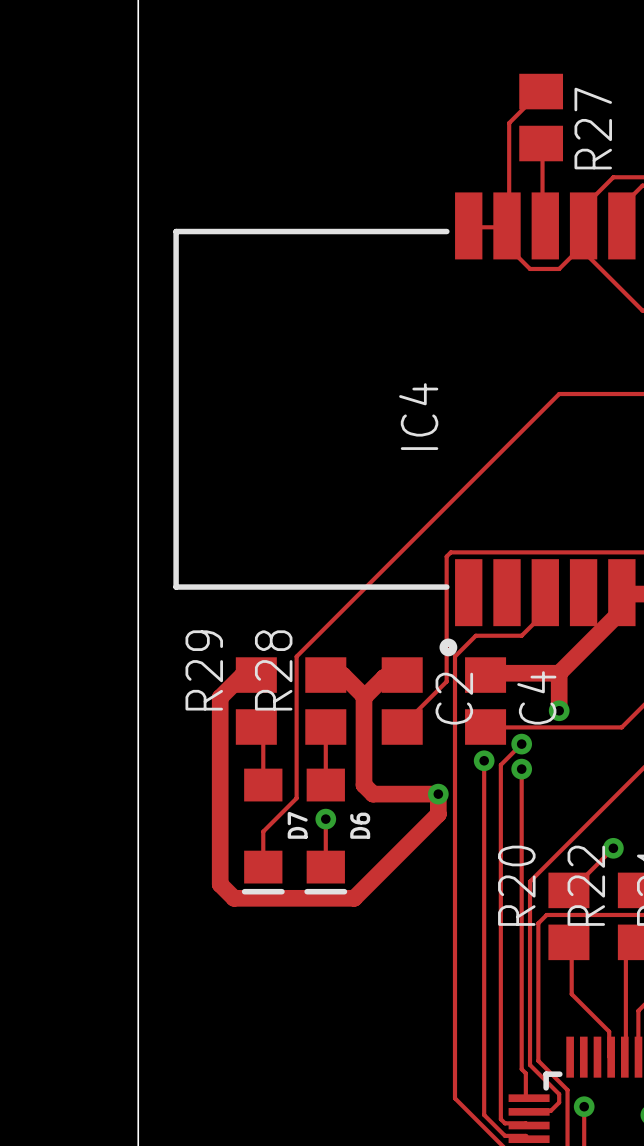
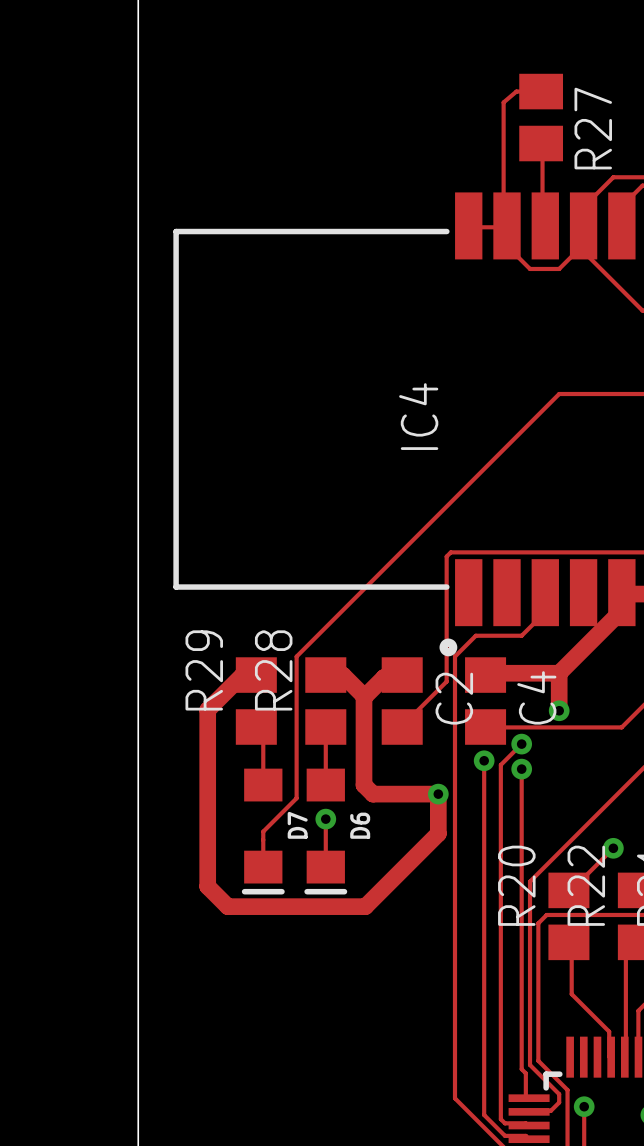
track: (541, 91) (509, 123) (509, 223) (507, 225) -> (541, 91) (516, 91) (503, 102) (503, 222) (507, 225)
track: (220, 697) (220, 884) (234, 898) (354, 898) (438, 814) -> (220, 697) (207, 710) (207, 886) (227, 906) (365, 906) (438, 833) (438, 814)

